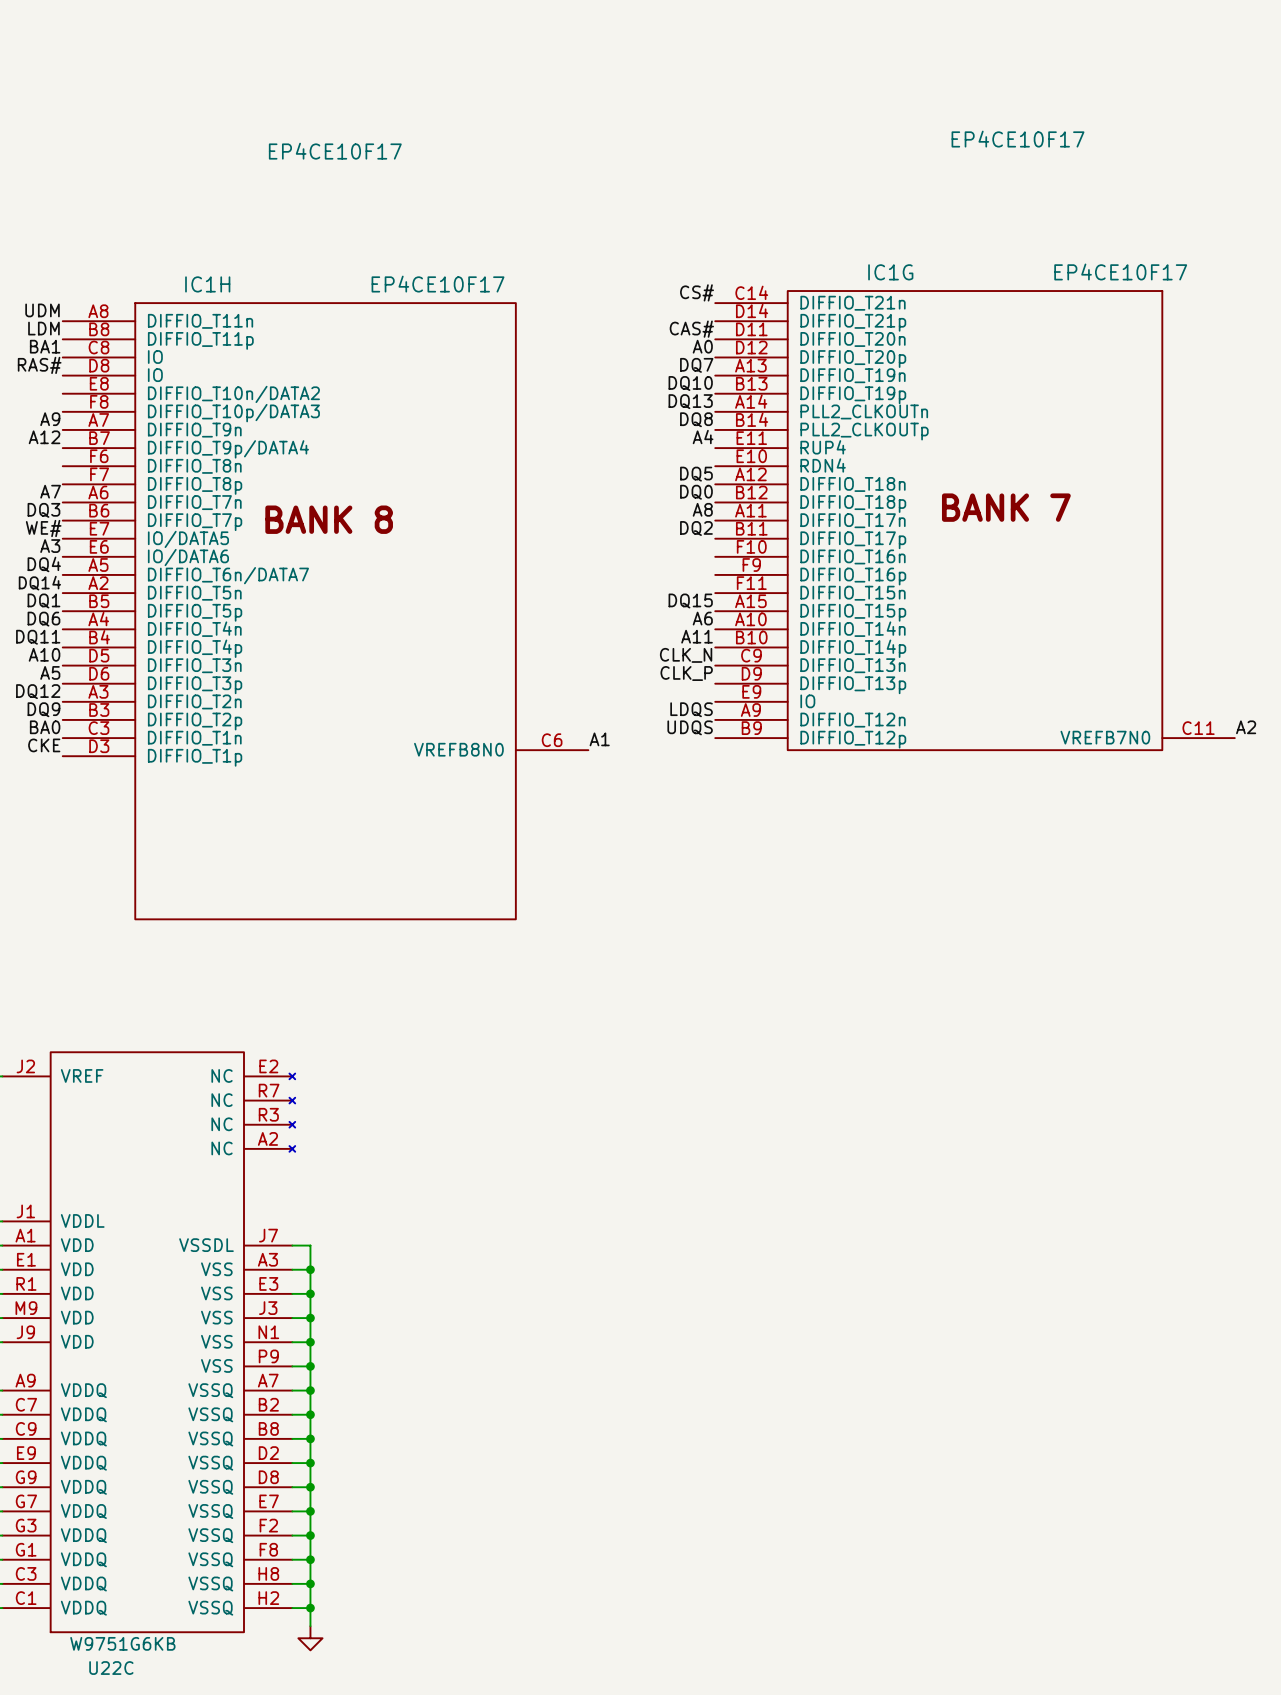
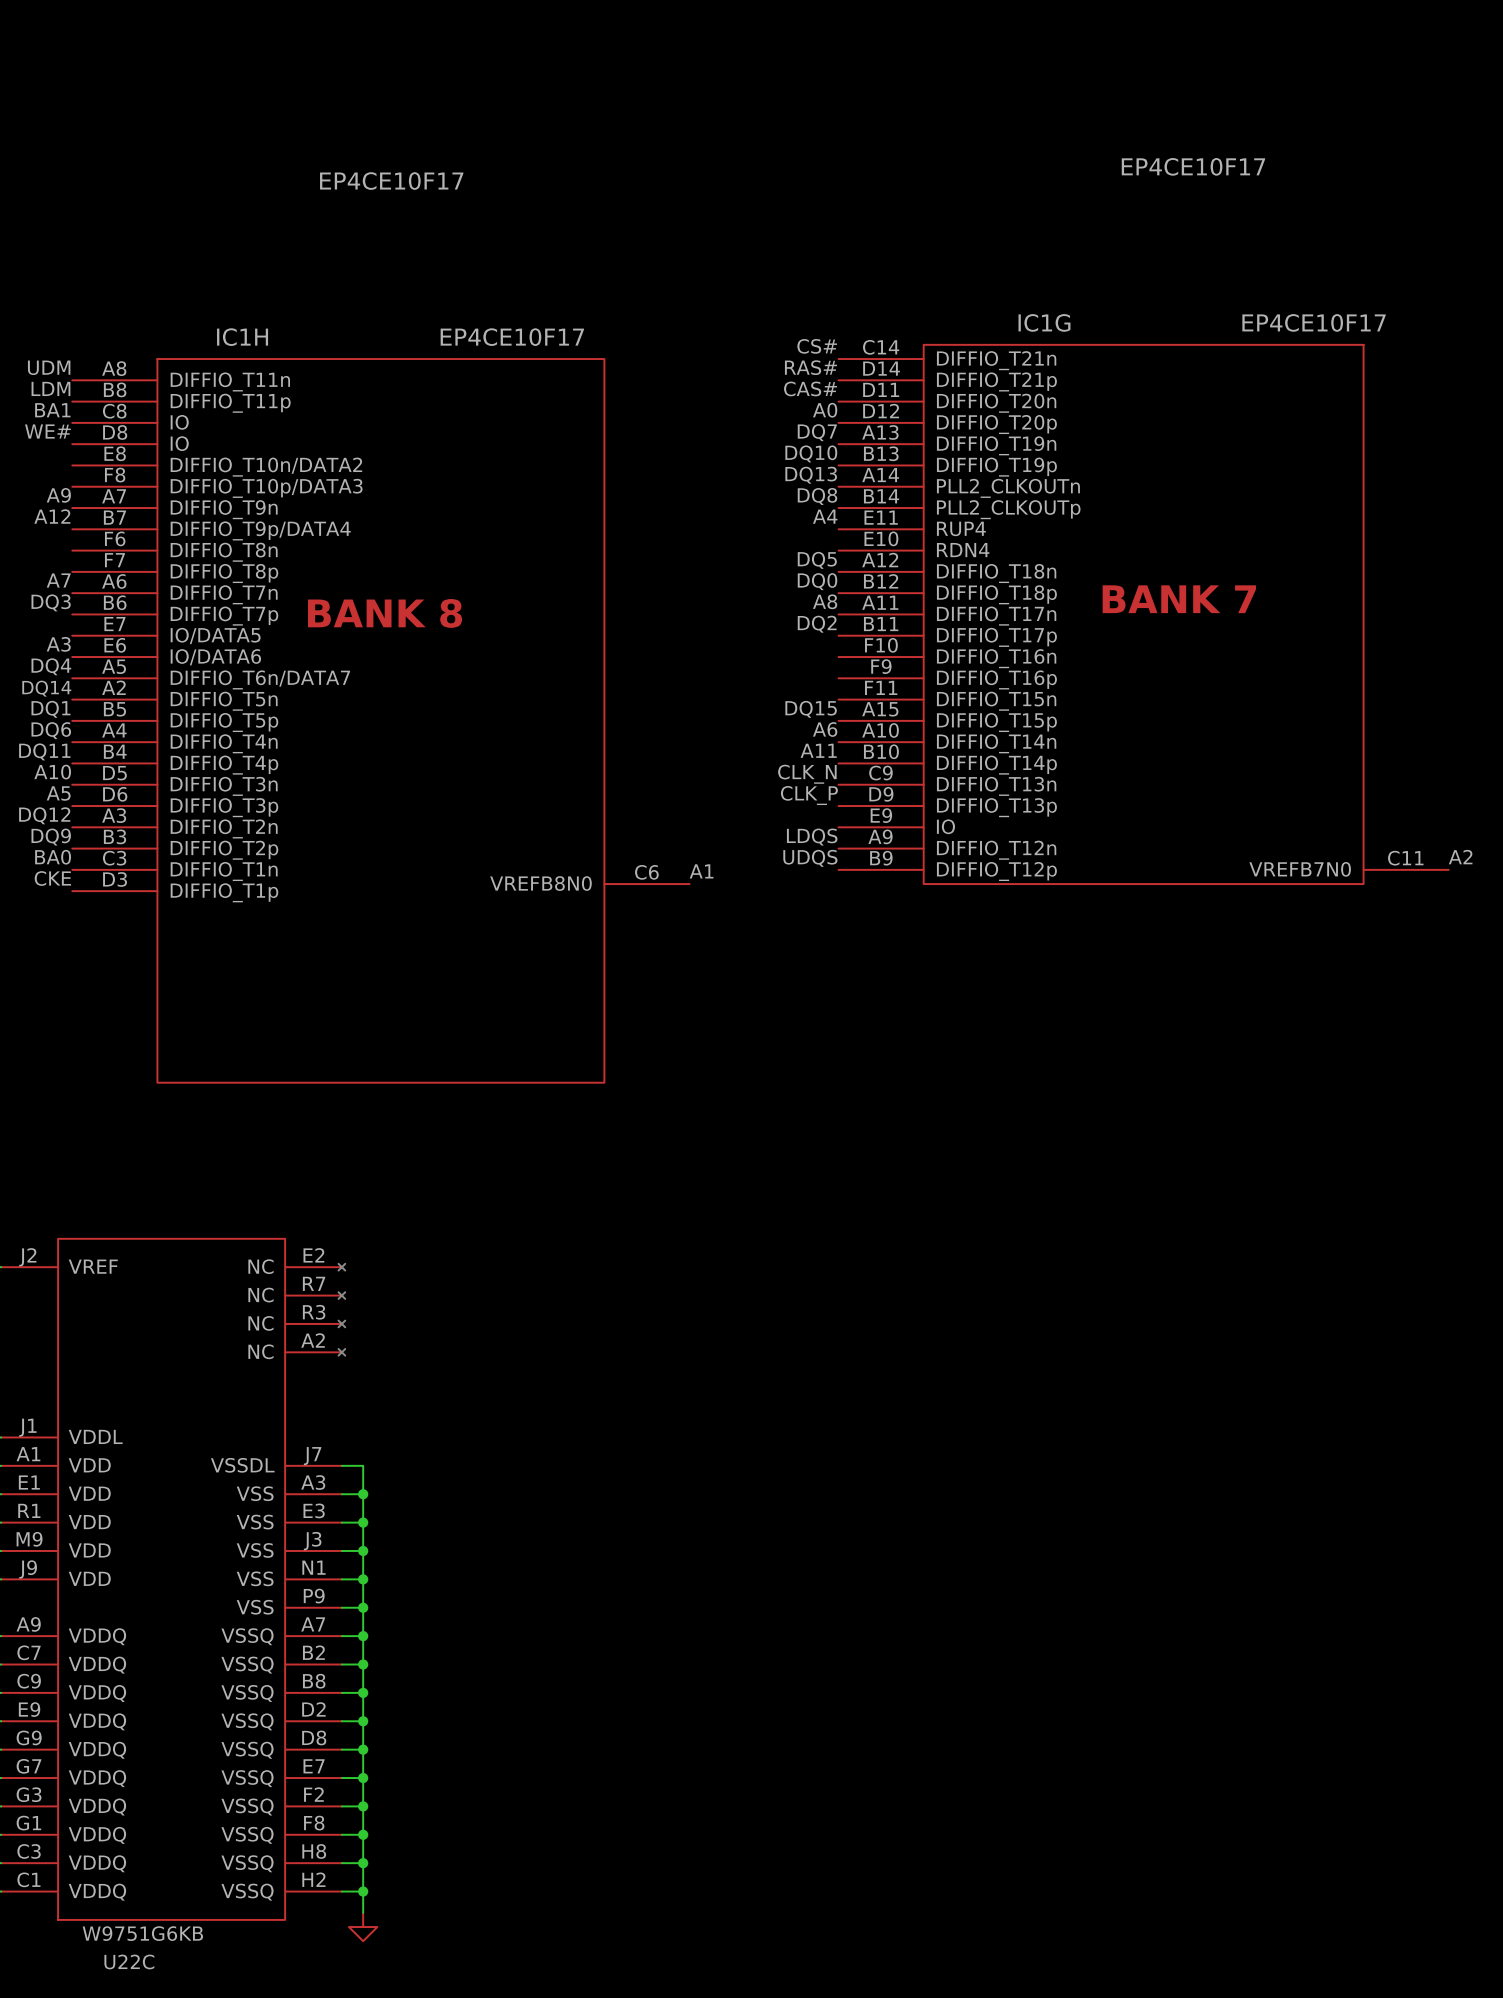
label: none -> RAS# (810, 367)
label: RAS# (39, 365) -> WE# (47, 431)
label: WE# (43, 528) -> none

